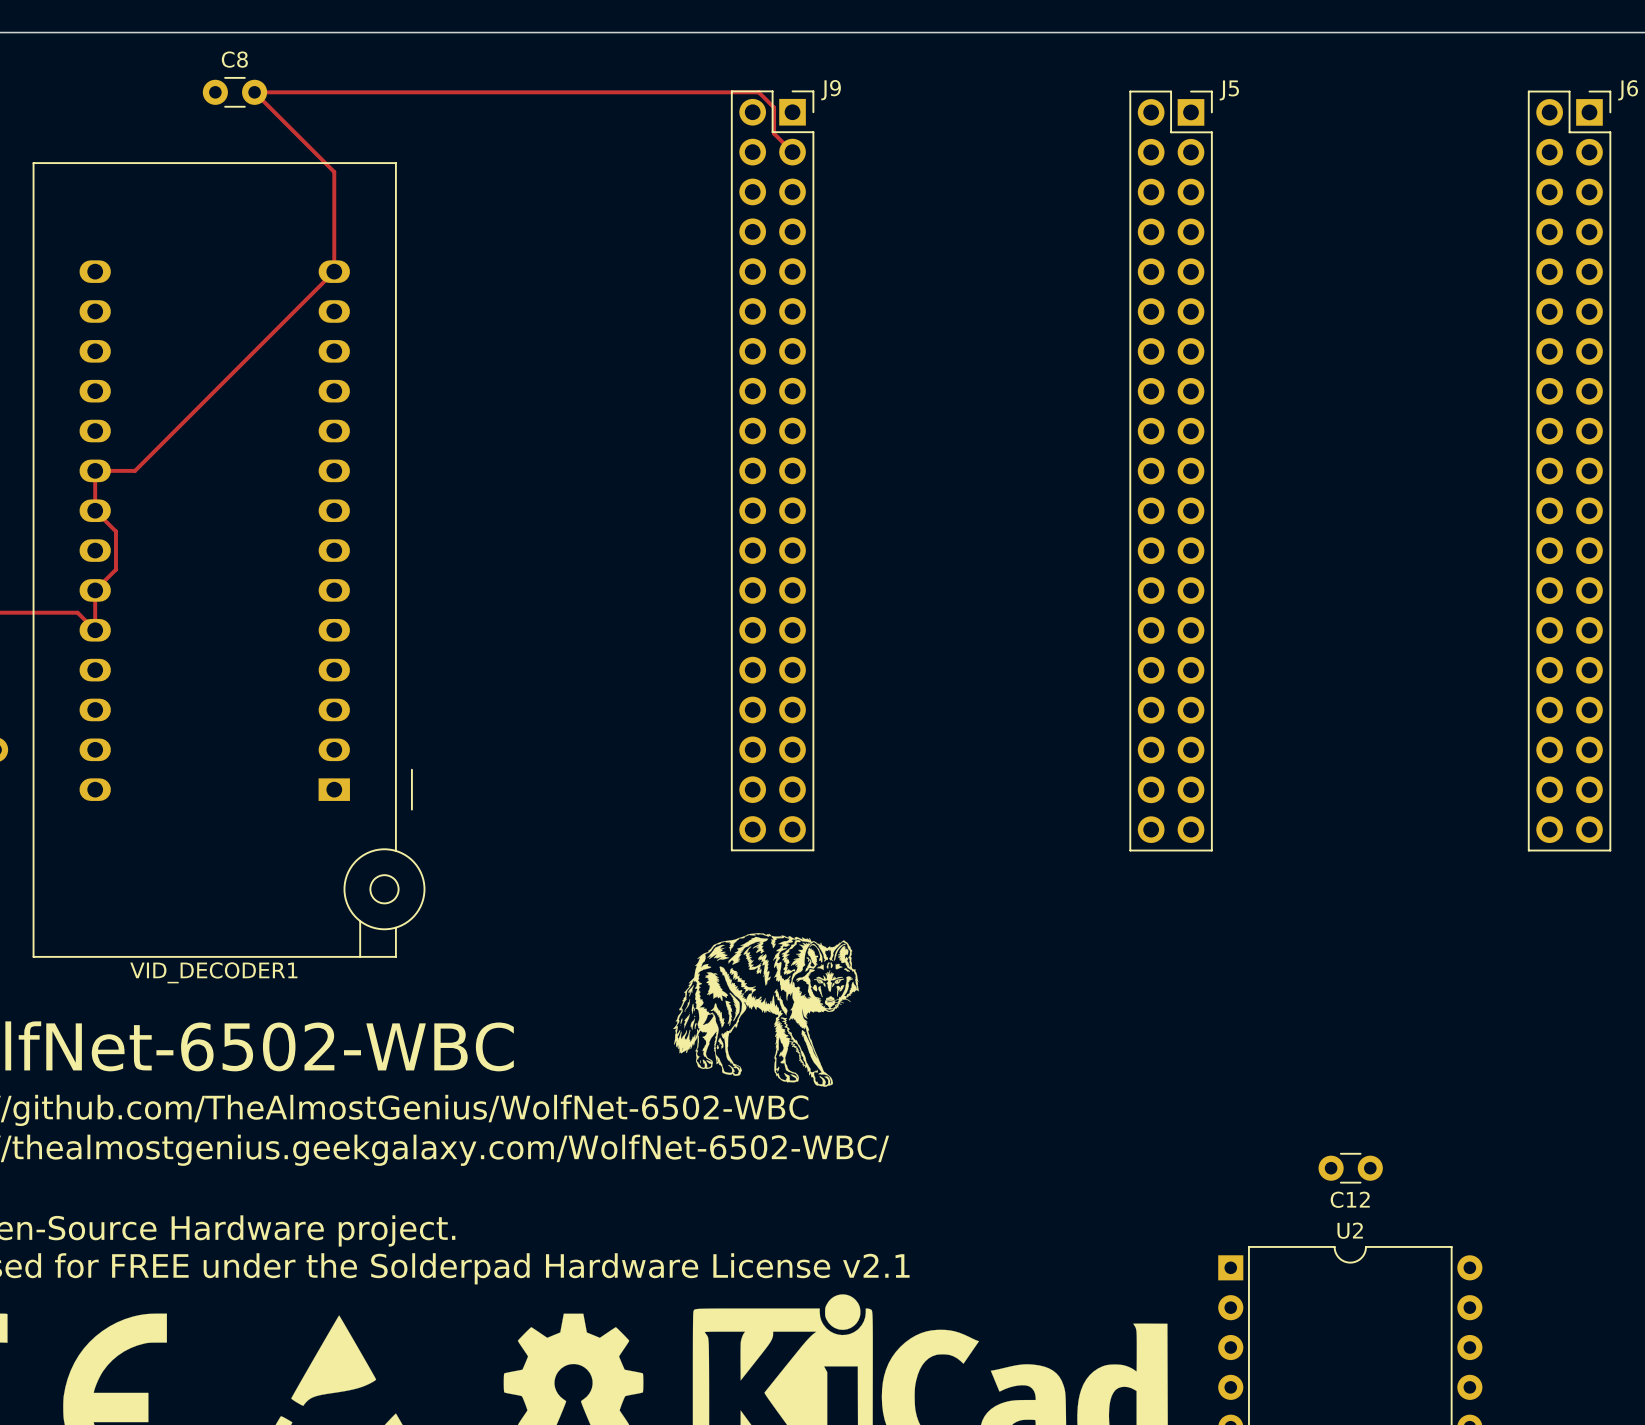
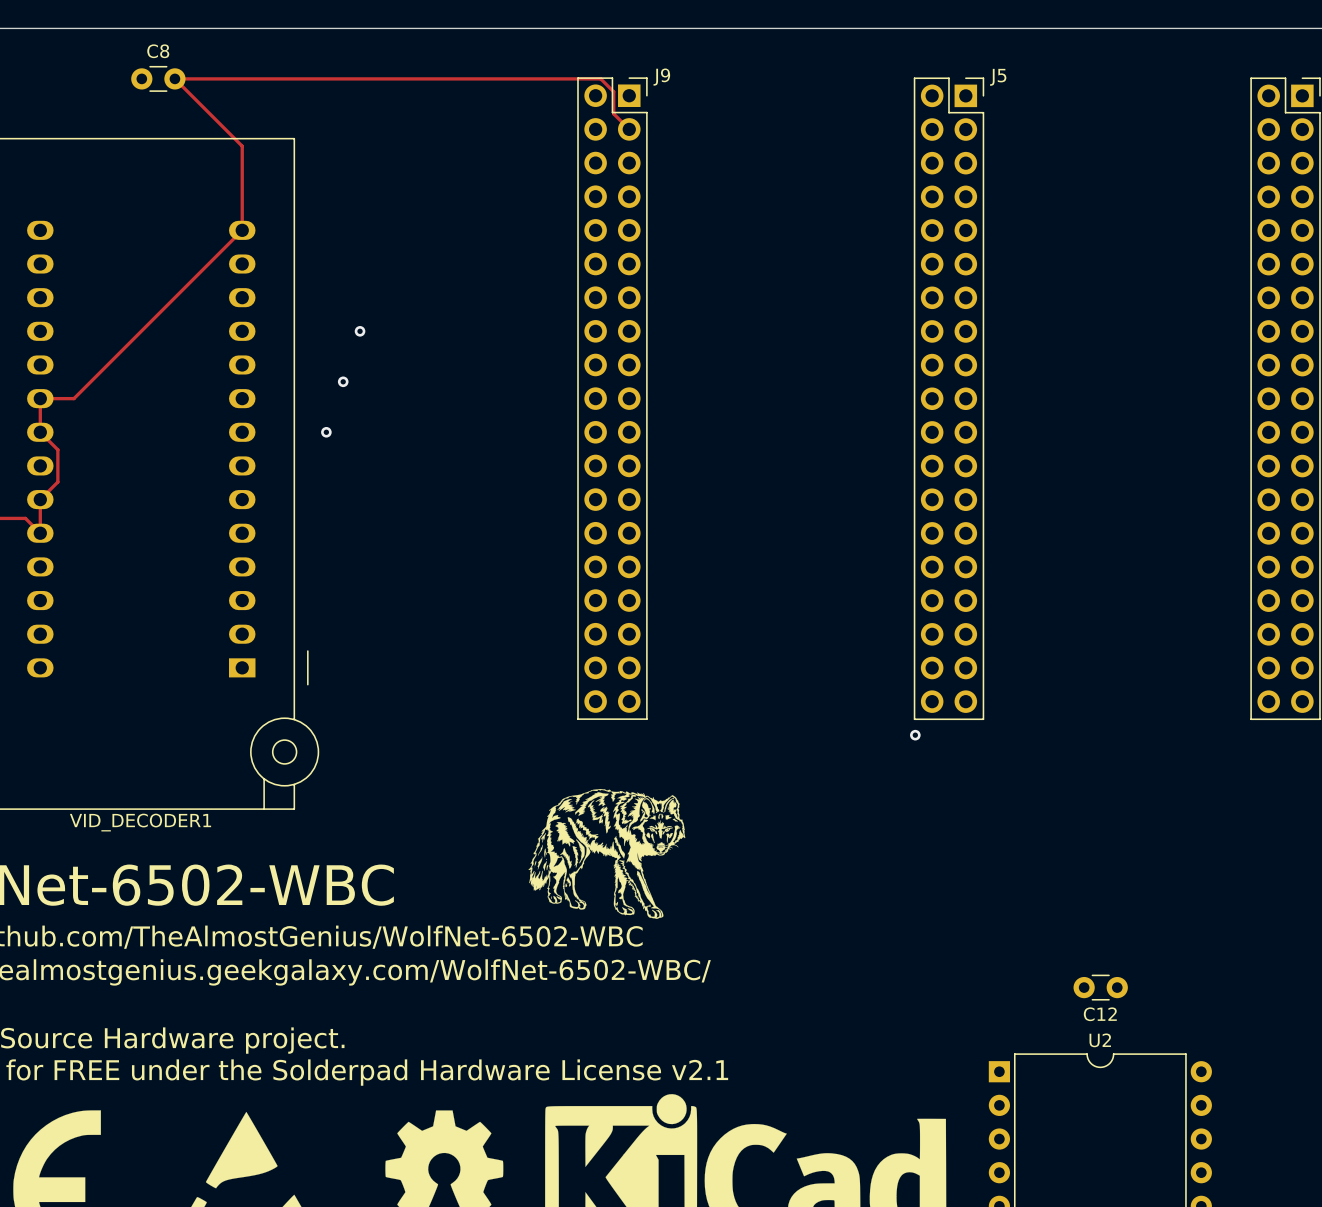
via: none -> (360, 331)
via: none -> (343, 381)
via: none -> (326, 432)
via: none -> (915, 735)

